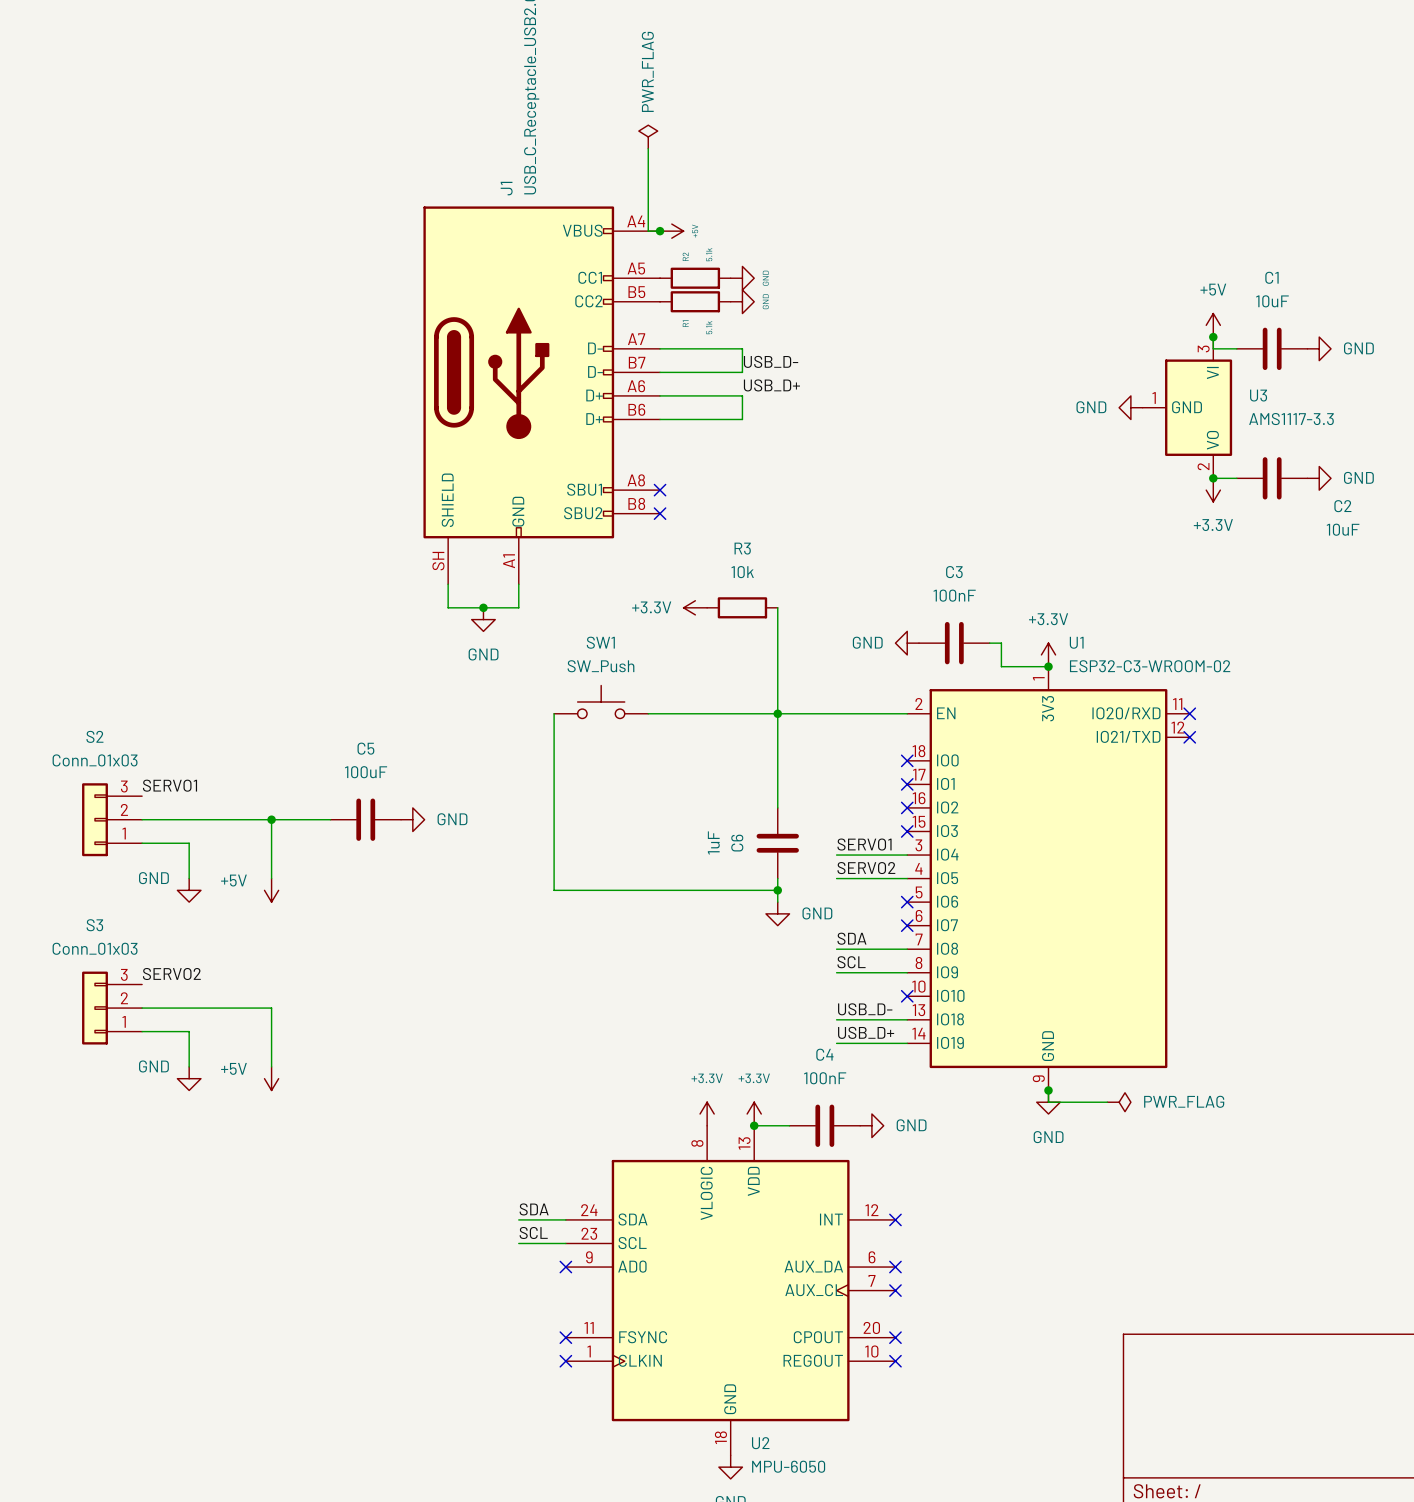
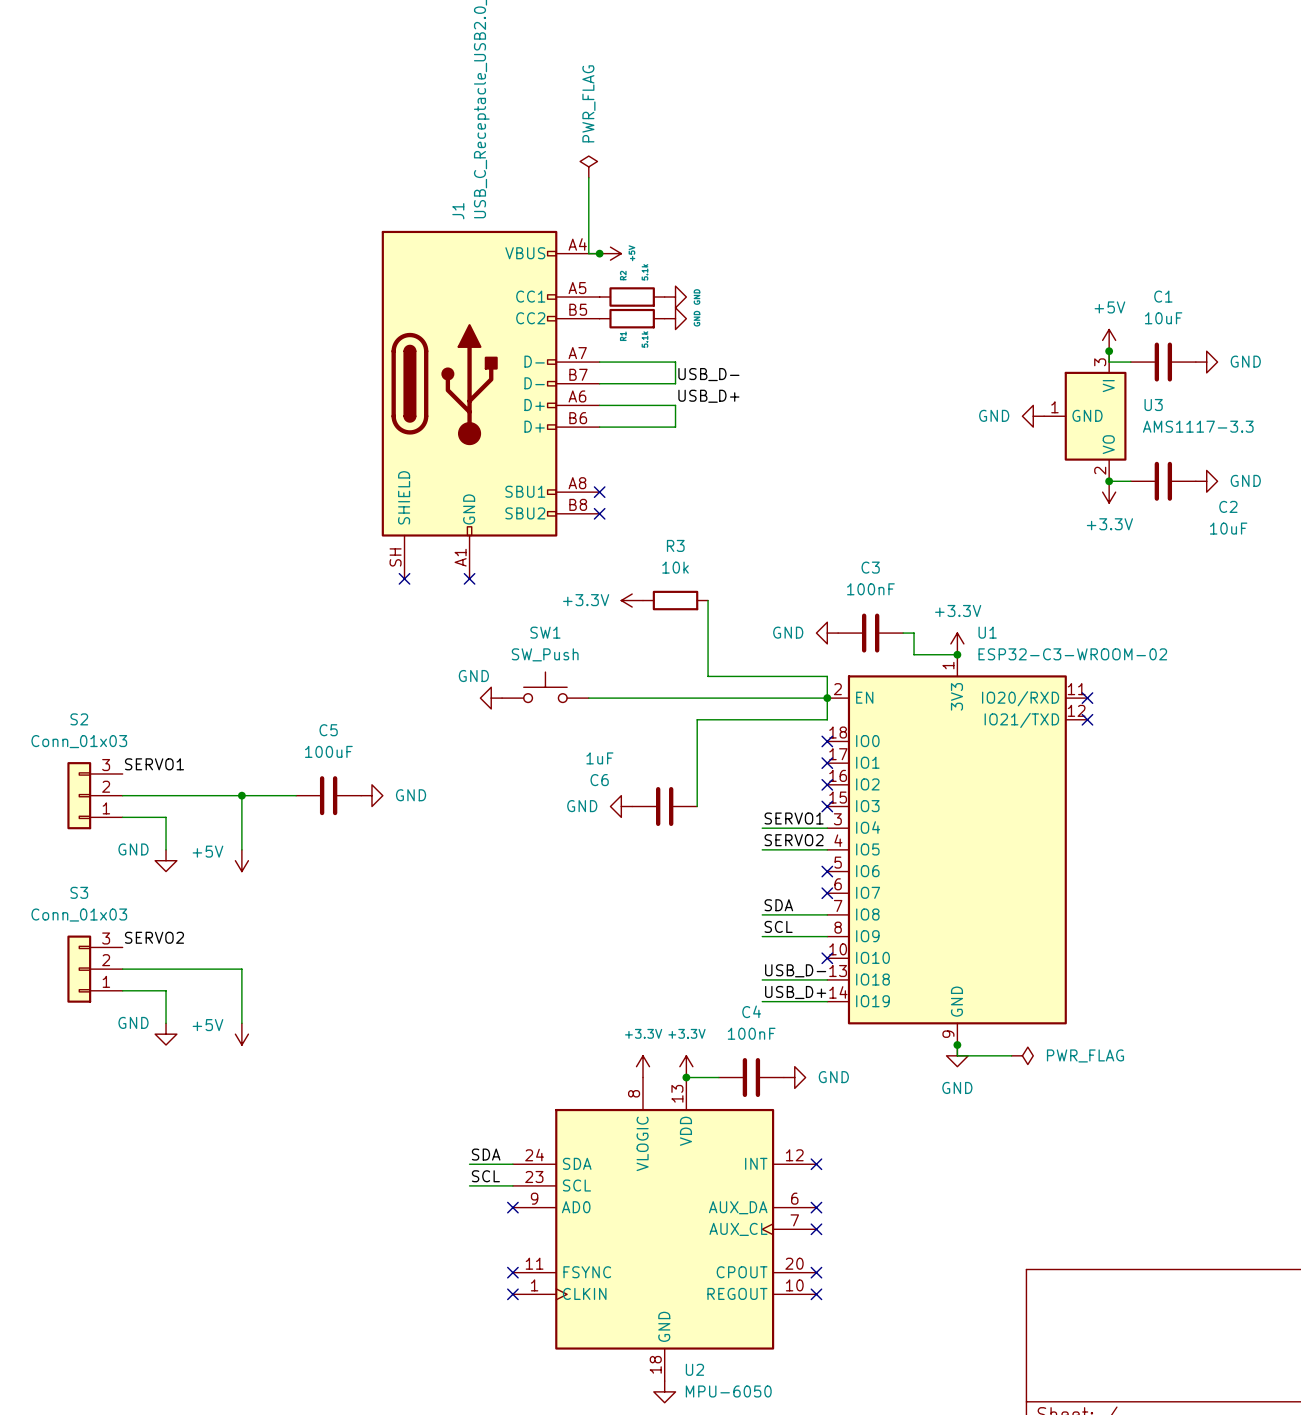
wire: (448, 584) (448, 607) (518, 607) (518, 584) -> none
no-connect mark: none -> (404, 578)
no-connect mark: none -> (469, 578)
junction: (483, 607) -> none
power symbol rotation: 0° (483, 619) -> 90° clockwise (491, 698)
power symbol position: GND (483, 619) -> GND (491, 698)
power symbol text position: GND (483, 654) -> GND (473, 676)
wire: (777, 690) (777, 807) -> (708, 676) (827, 676) (827, 719) (697, 719) (697, 806)
wire: (554, 713) (554, 890) (777, 890) -> none
junction: (777, 713) -> none
junction: none -> (827, 698)
C6 value position: 1uF (713, 842) -> 1uF (599, 758)
C6 name position: C6 (737, 843) -> C6 (599, 780)
C6 rotation: 0° (777, 843) -> 90° clockwise (664, 806)
C6 position: (777, 843) -> (664, 806)
wire: (777, 878) (777, 902) -> none
junction: (777, 890) -> none
power symbol rotation: 0° (777, 913) -> 90° clockwise (621, 806)
power symbol position: GND (777, 913) -> GND (621, 806)
power symbol text position: GND (817, 913) -> GND (582, 806)

